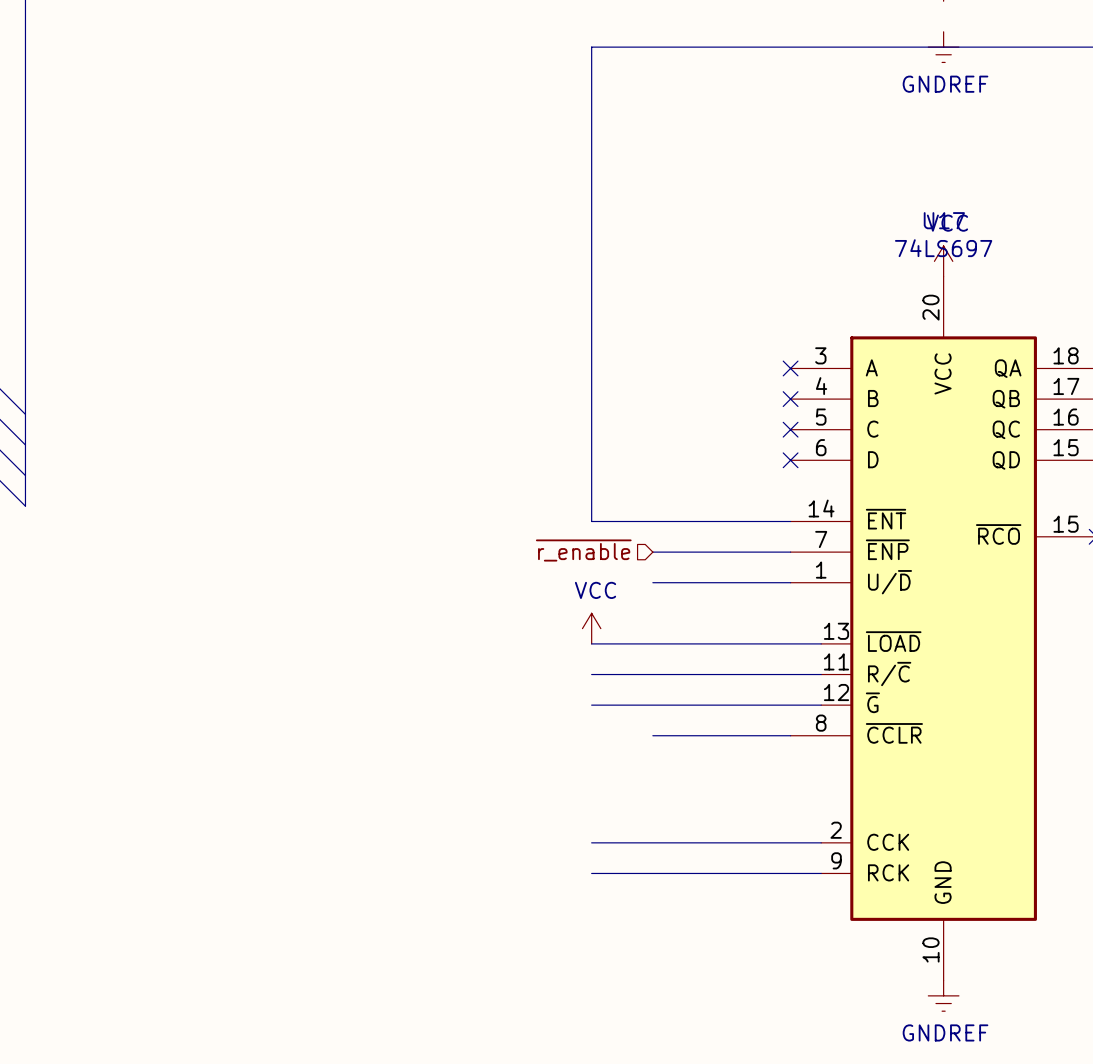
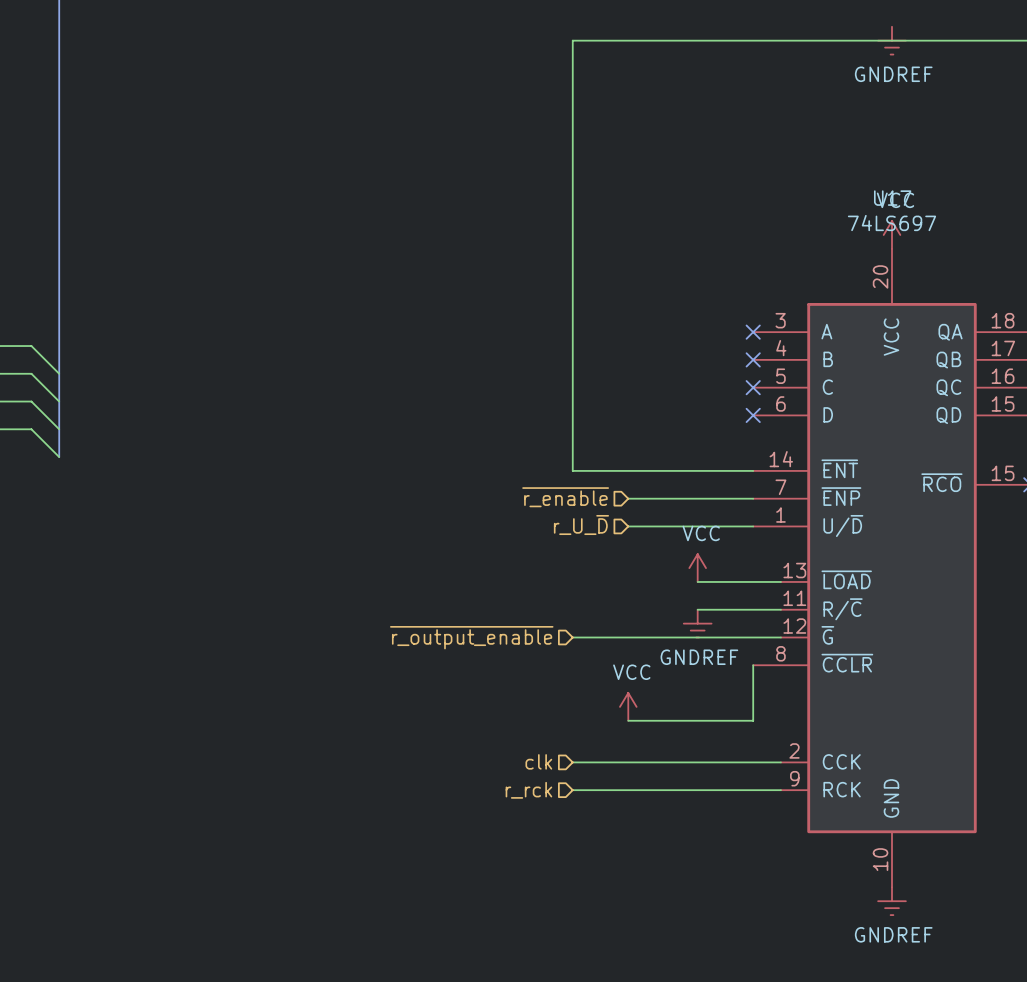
hierarchical label: none -> r_U_~{D} (581, 525)
power symbol: VCC (591, 628) -> none
power symbol: none -> VCC (697, 568)
wire: (591, 643) (729, 643) -> none
wire: (591, 674) (729, 674) -> none
power symbol: none -> GNDREF (697, 623)
hierarchical label: none -> ~{r_output_enable} (471, 637)
wire: (652, 735) (790, 735) -> (628, 720) (753, 720) (753, 665)
power symbol: none -> VCC (628, 706)
hierarchical label: none -> clk (538, 761)
hierarchical label: none -> r_rck (528, 790)

